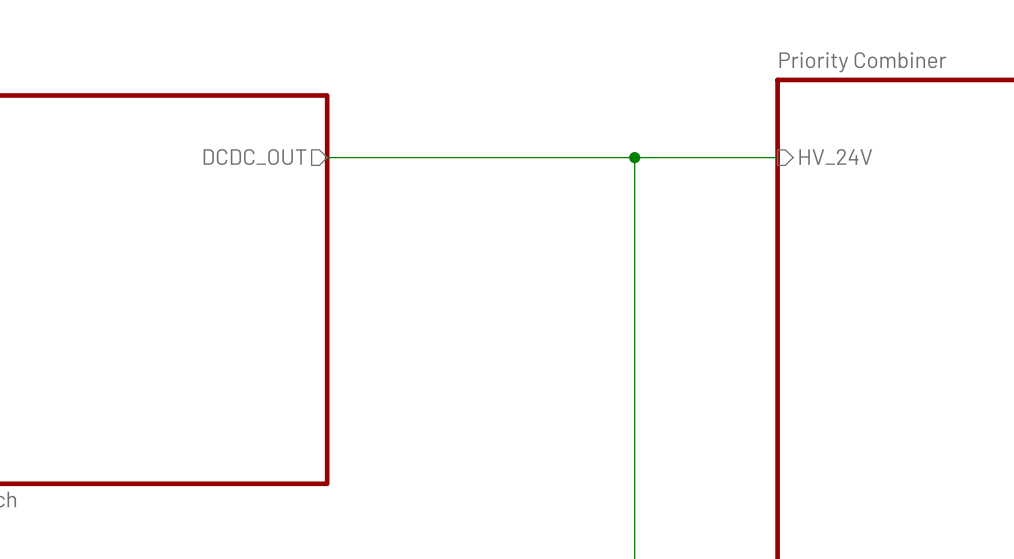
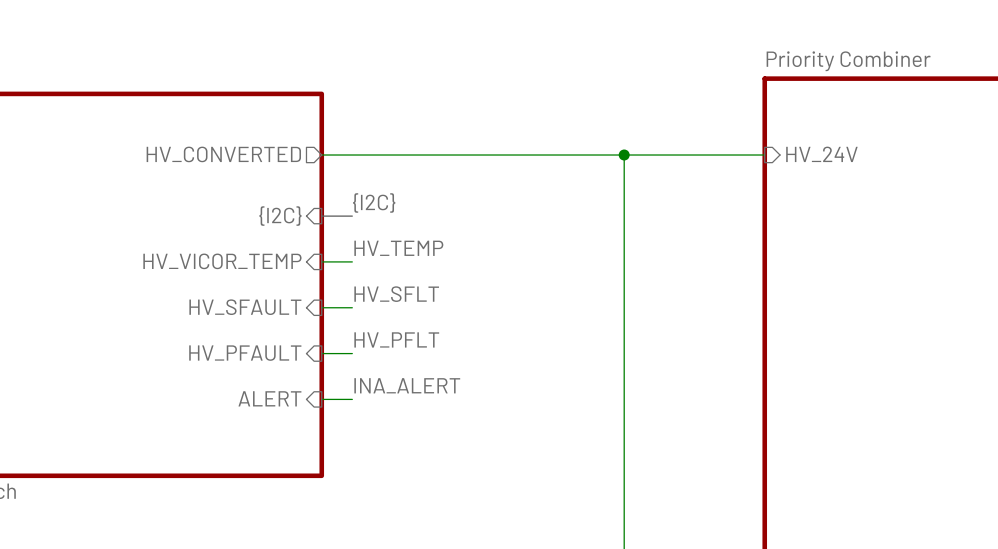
sheet pin: DCDC_OUT (255, 157) -> HV_CONVERTED (223, 154)
label: none -> {I2C} (374, 202)
sheet pin: none -> {I2C} (280, 216)
bus: none -> (321, 216) (352, 216)
label: none -> HV_TEMP (398, 248)
sheet pin: none -> HV_VICOR_TEMP (222, 261)
wire: none -> (321, 261) (352, 261)
label: none -> HV_SFLT (396, 294)
sheet pin: none -> HV_SFAULT (245, 307)
wire: none -> (321, 307) (352, 307)
label: none -> HV_PFLT (396, 339)
sheet pin: none -> HV_PFAULT (245, 353)
wire: none -> (321, 353) (352, 353)
label: none -> INA_ALERT (407, 385)
sheet pin: none -> ALERT (269, 398)
wire: none -> (321, 399) (352, 399)

